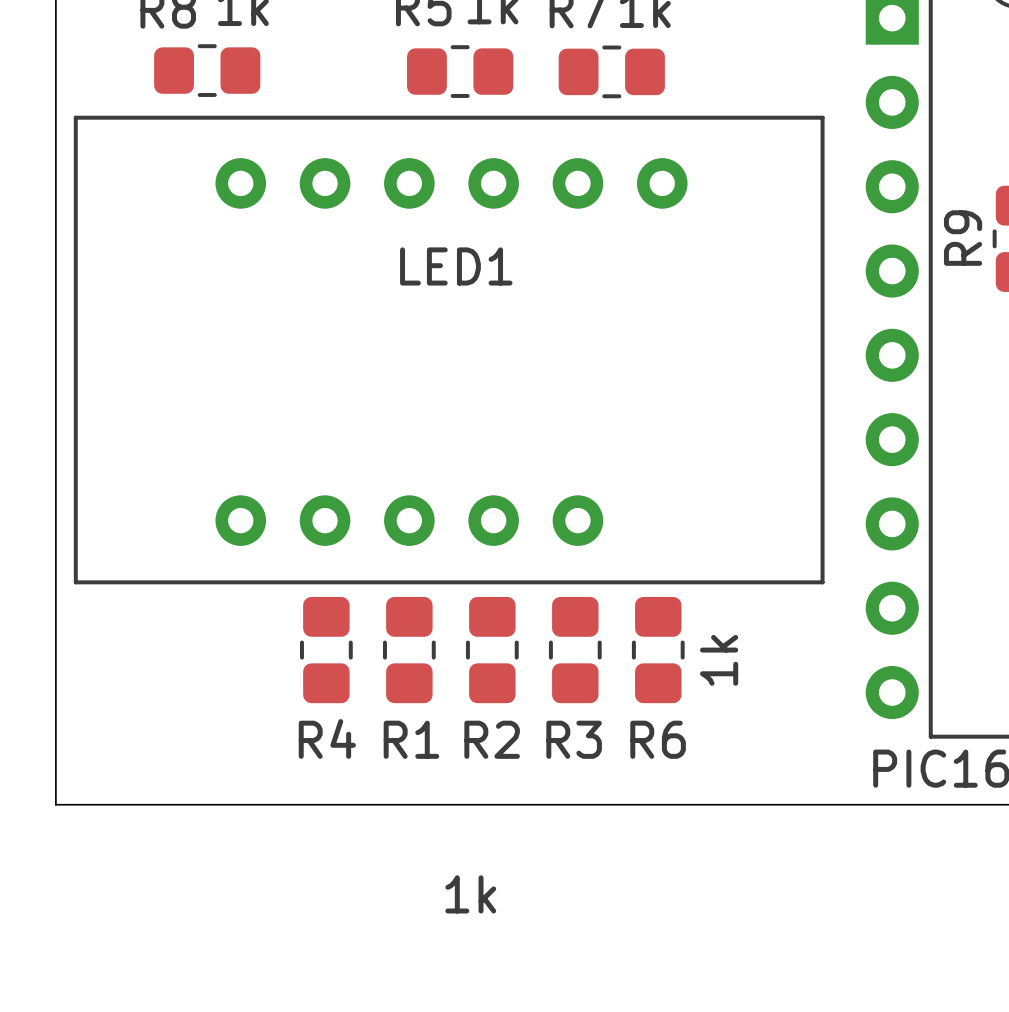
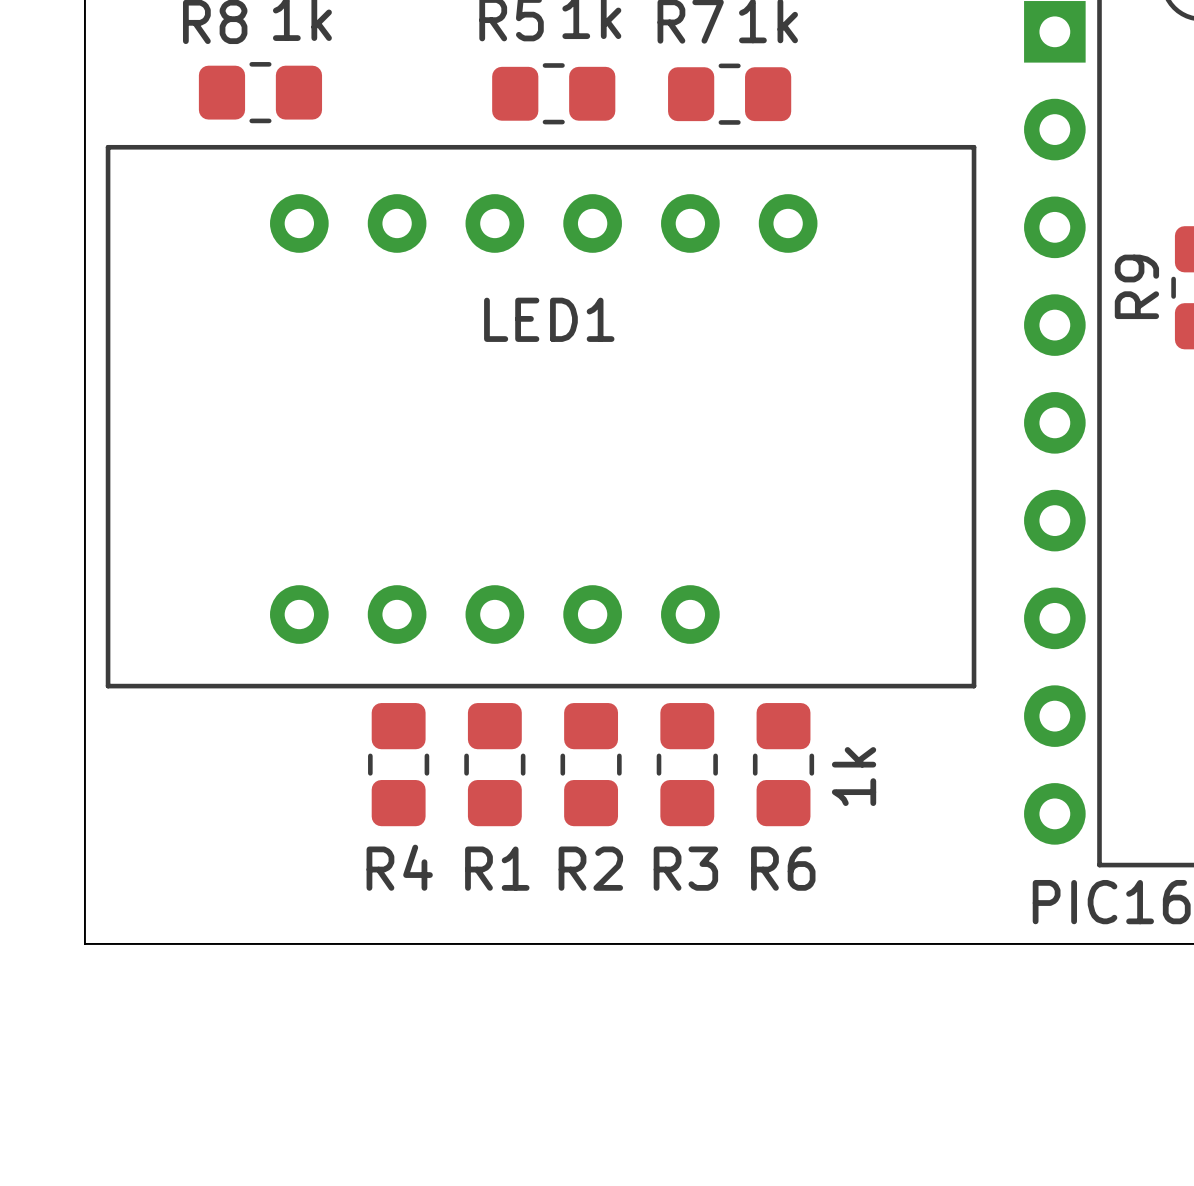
R2 value: 1k (470, 894) -> none

